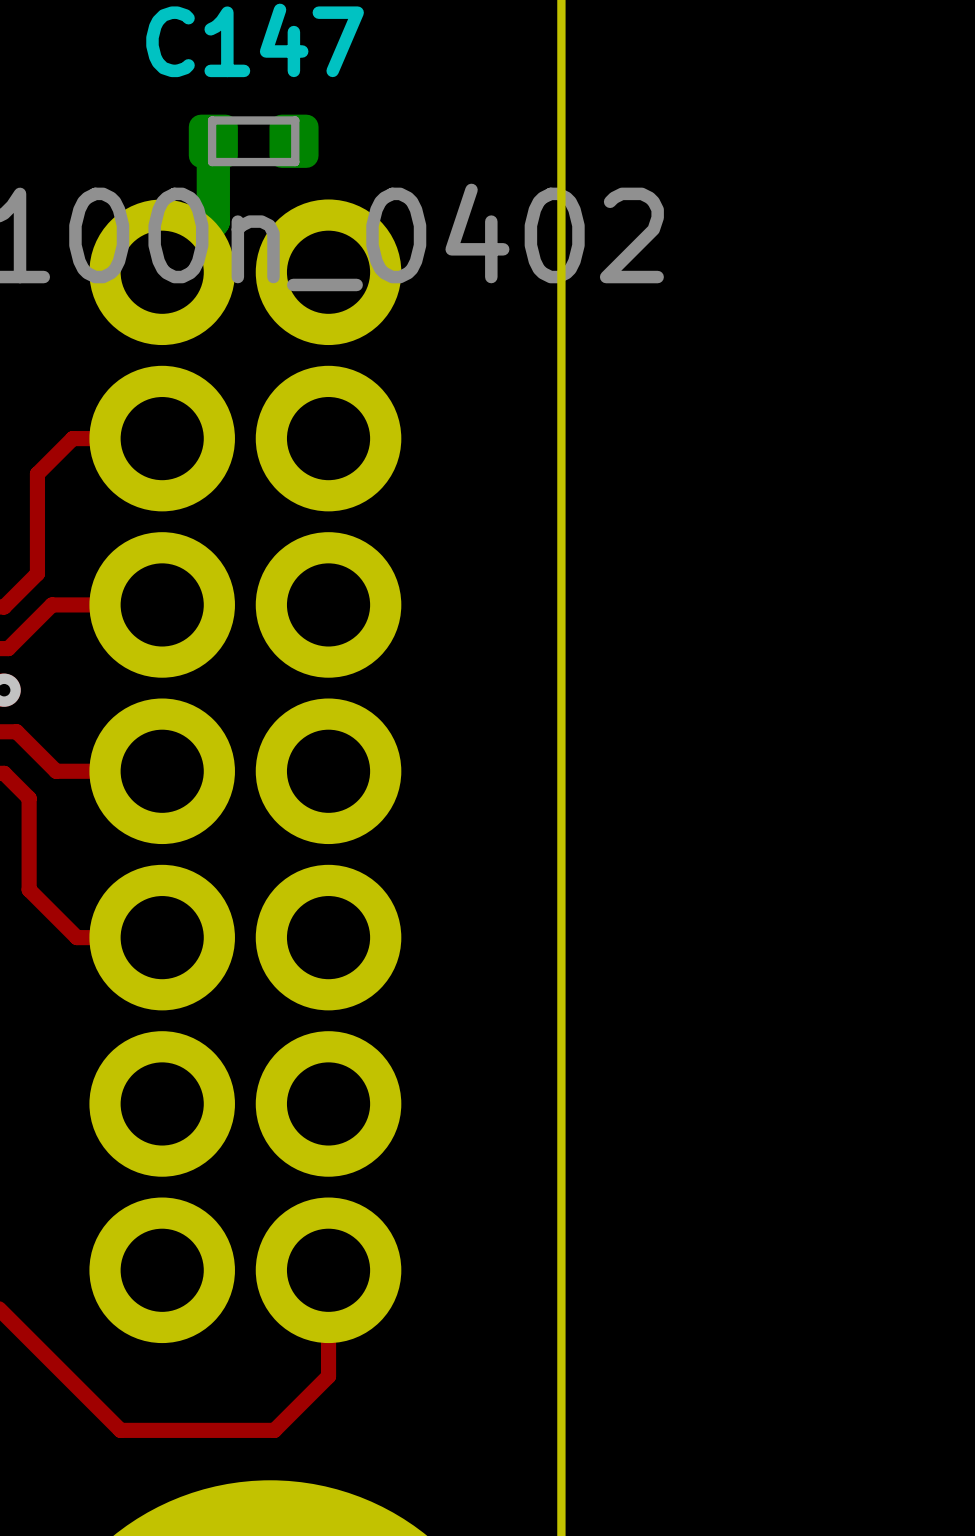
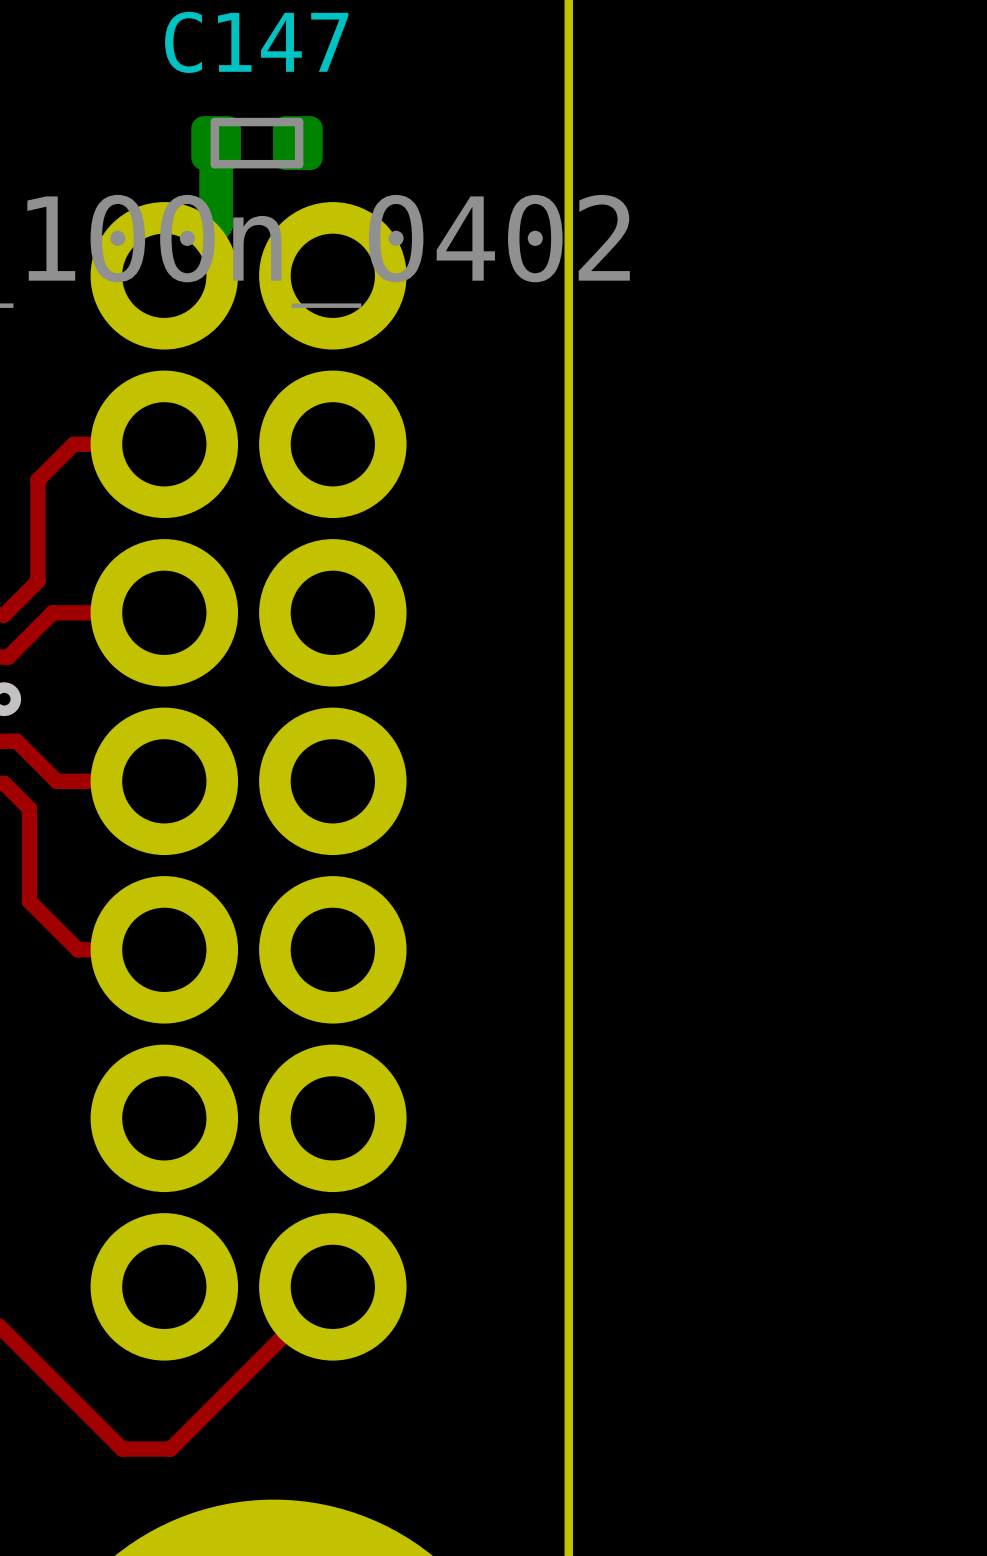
top track: (328, 1270) (328, 1376) (274, 1430) (168, 1430) -> (332, 1286) (170, 1449)

